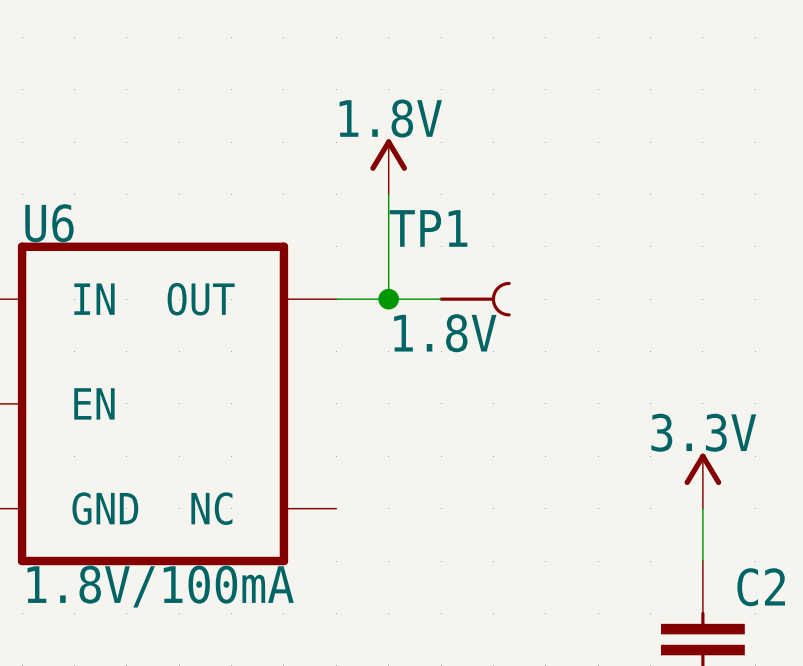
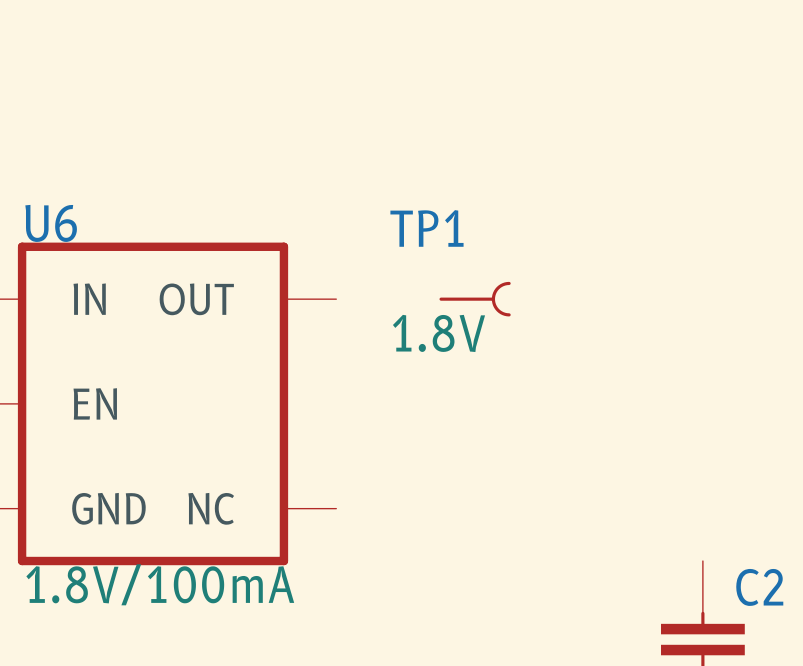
power symbol: 1.8V (388, 166) -> none
wire: (388, 194) (388, 299) -> none
wire: (336, 299) (441, 299) -> none
junction: (388, 299) -> none
power symbol: 3.3V (702, 481) -> none
wire: (702, 508) (702, 561) -> none

